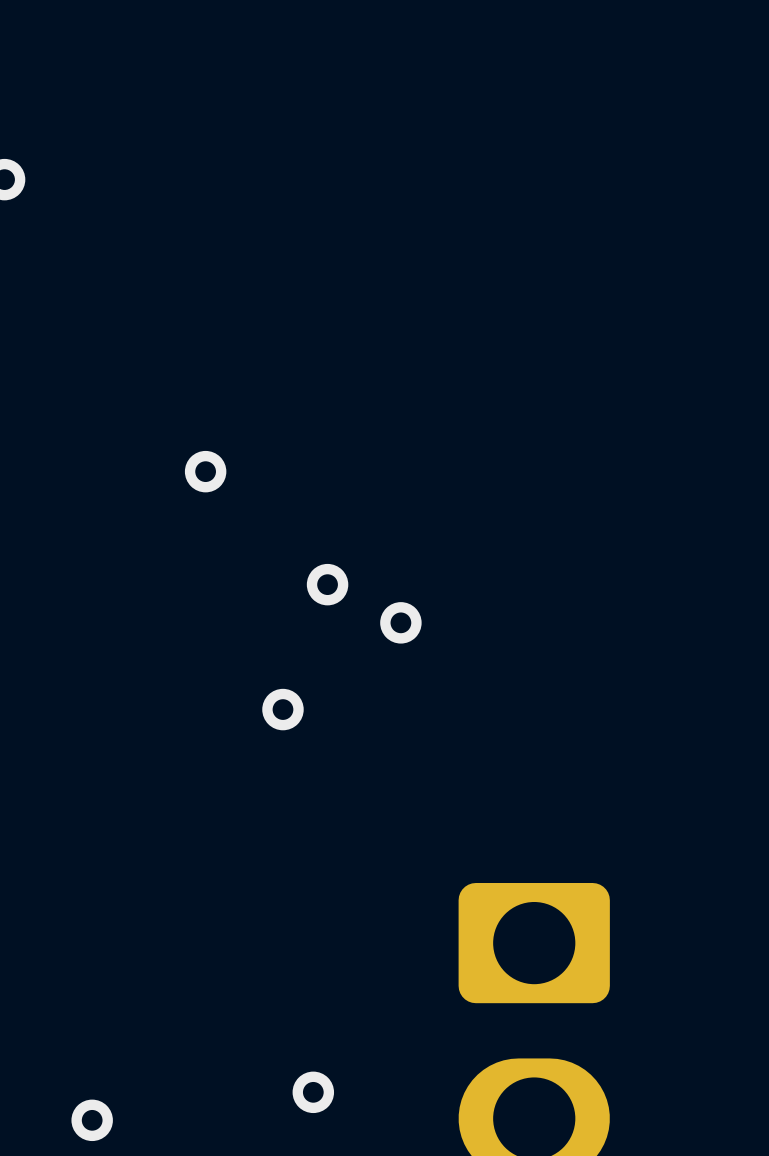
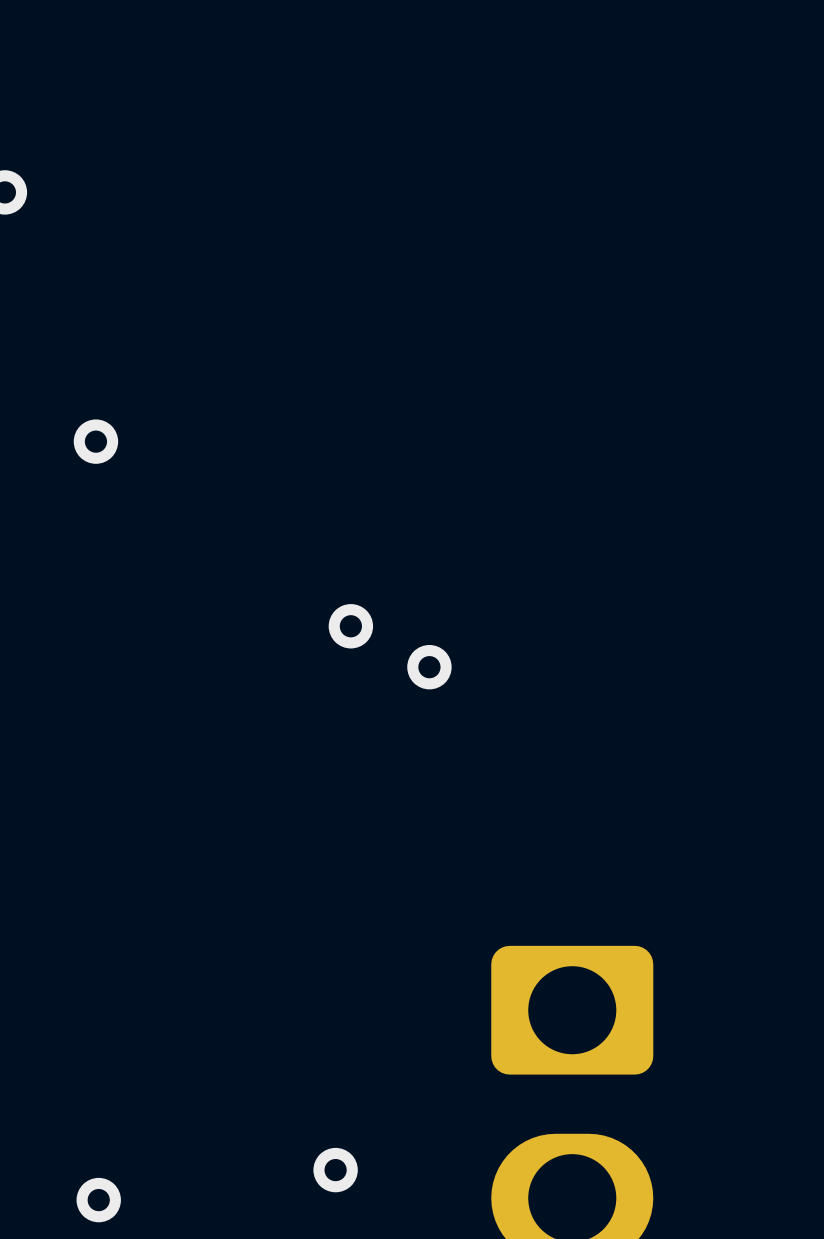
via position: (205, 471) -> (95, 441)
via: (282, 709) -> none

